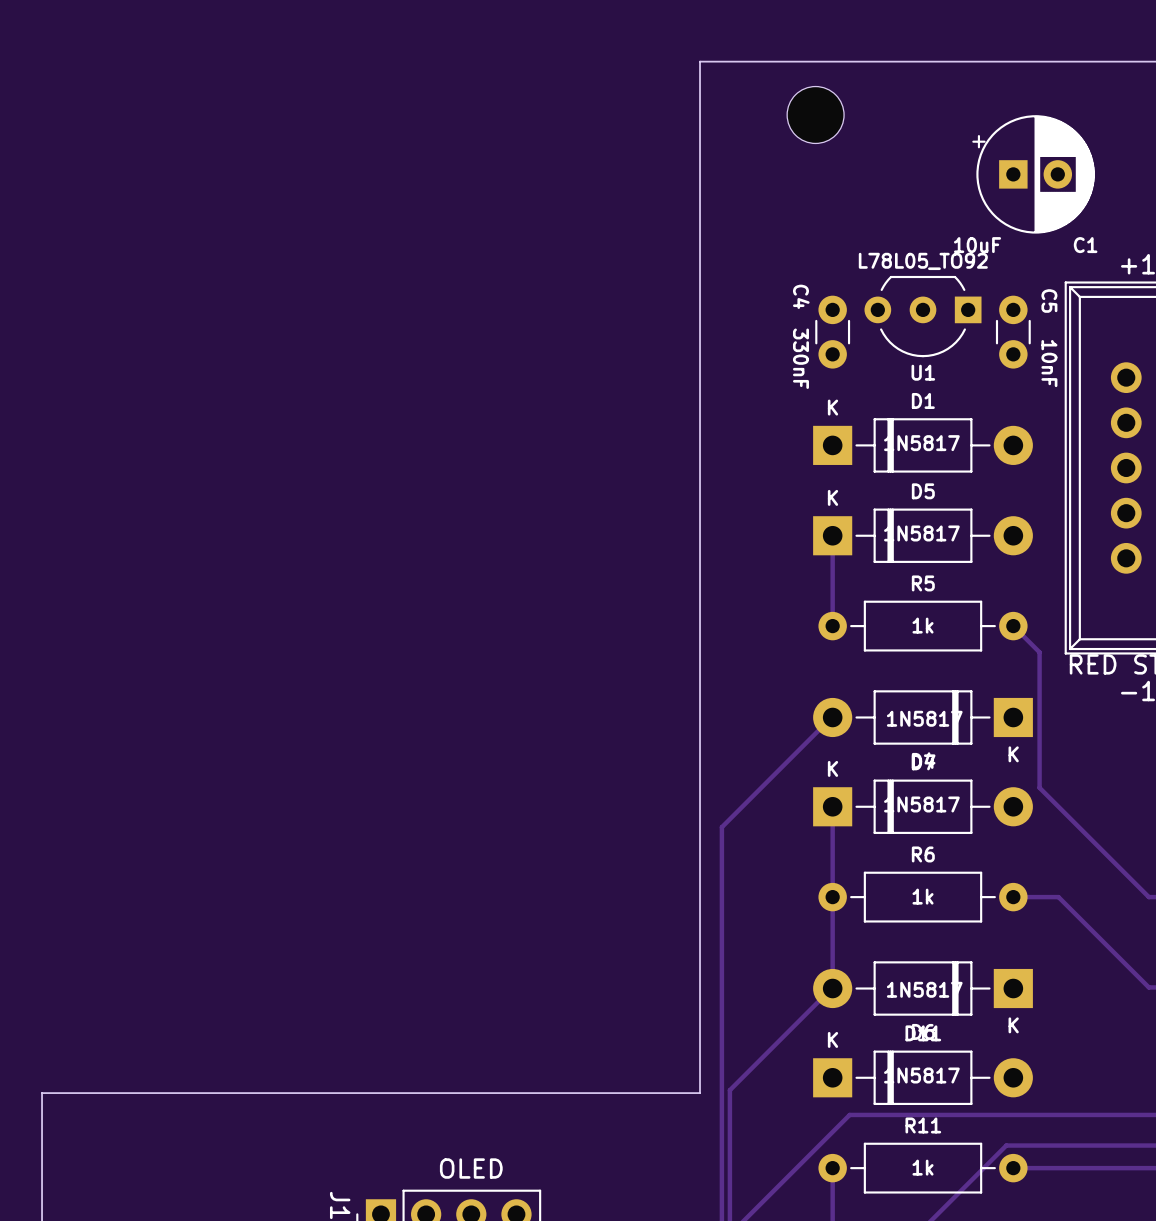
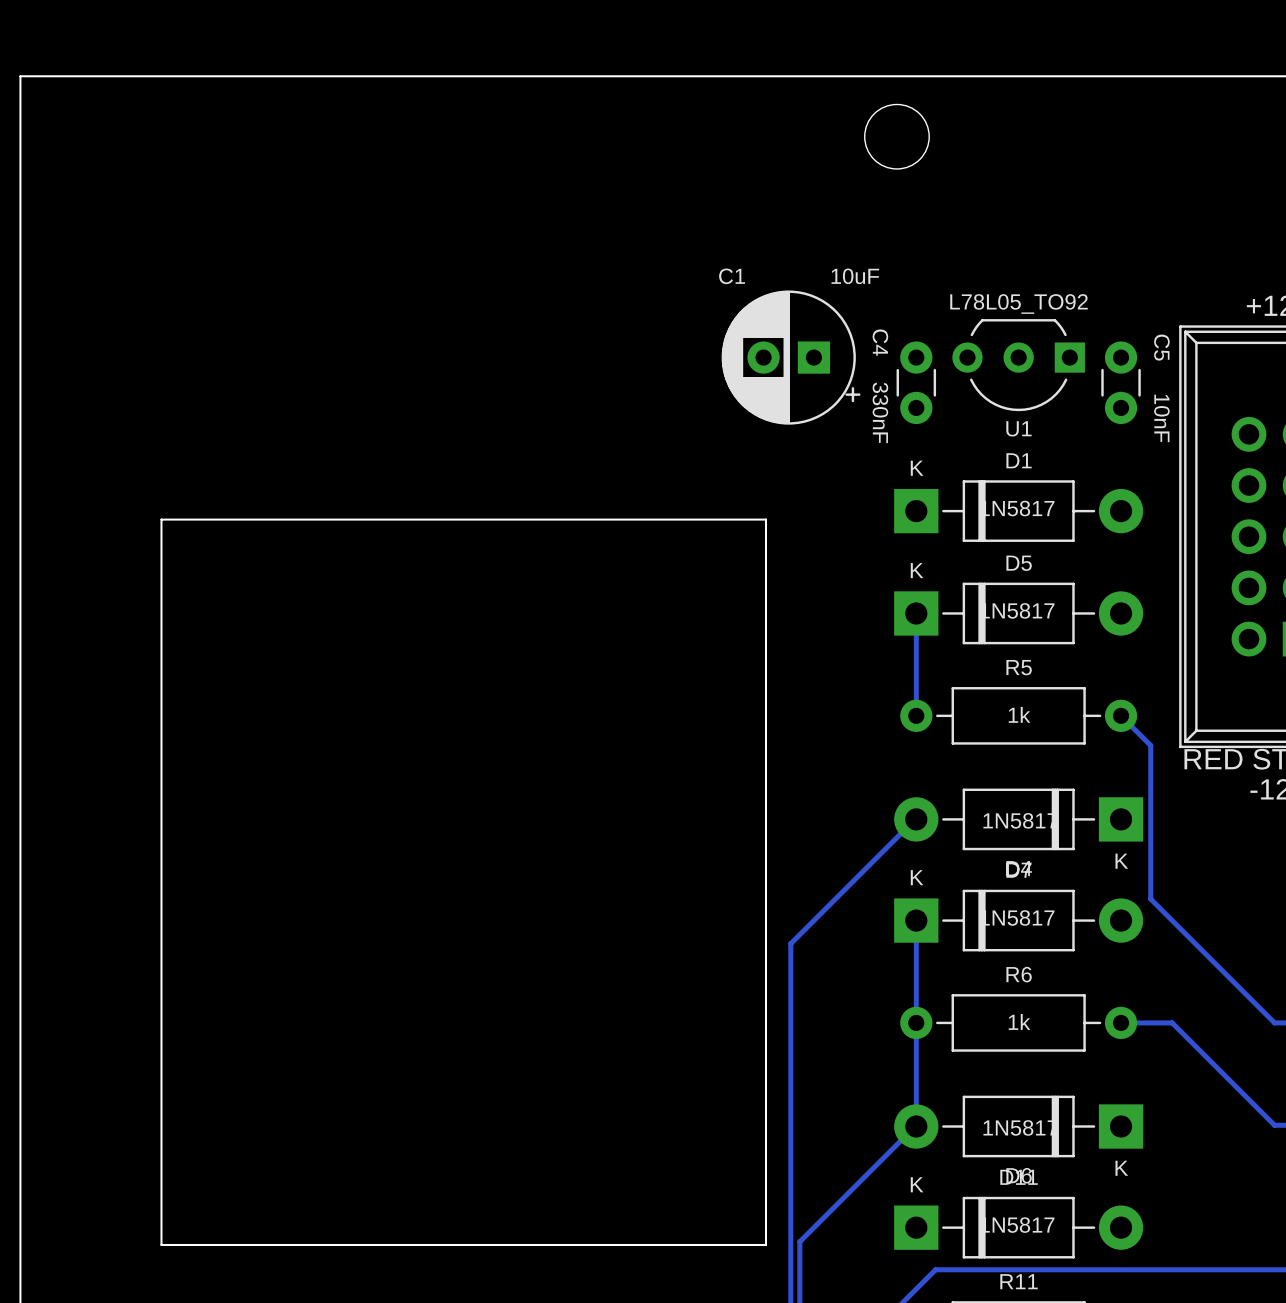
board edge: (700, 61) (700, 452) -> (765, 76) (20, 76) (20, 1244)
C1 rotation: 0° (1033, 174) -> 180° (791, 357)
C1 position: (1033, 174) -> (791, 357)
board edge: (166, 1093) (42, 1093) -> (161, 1244) (161, 519) (765, 519)

